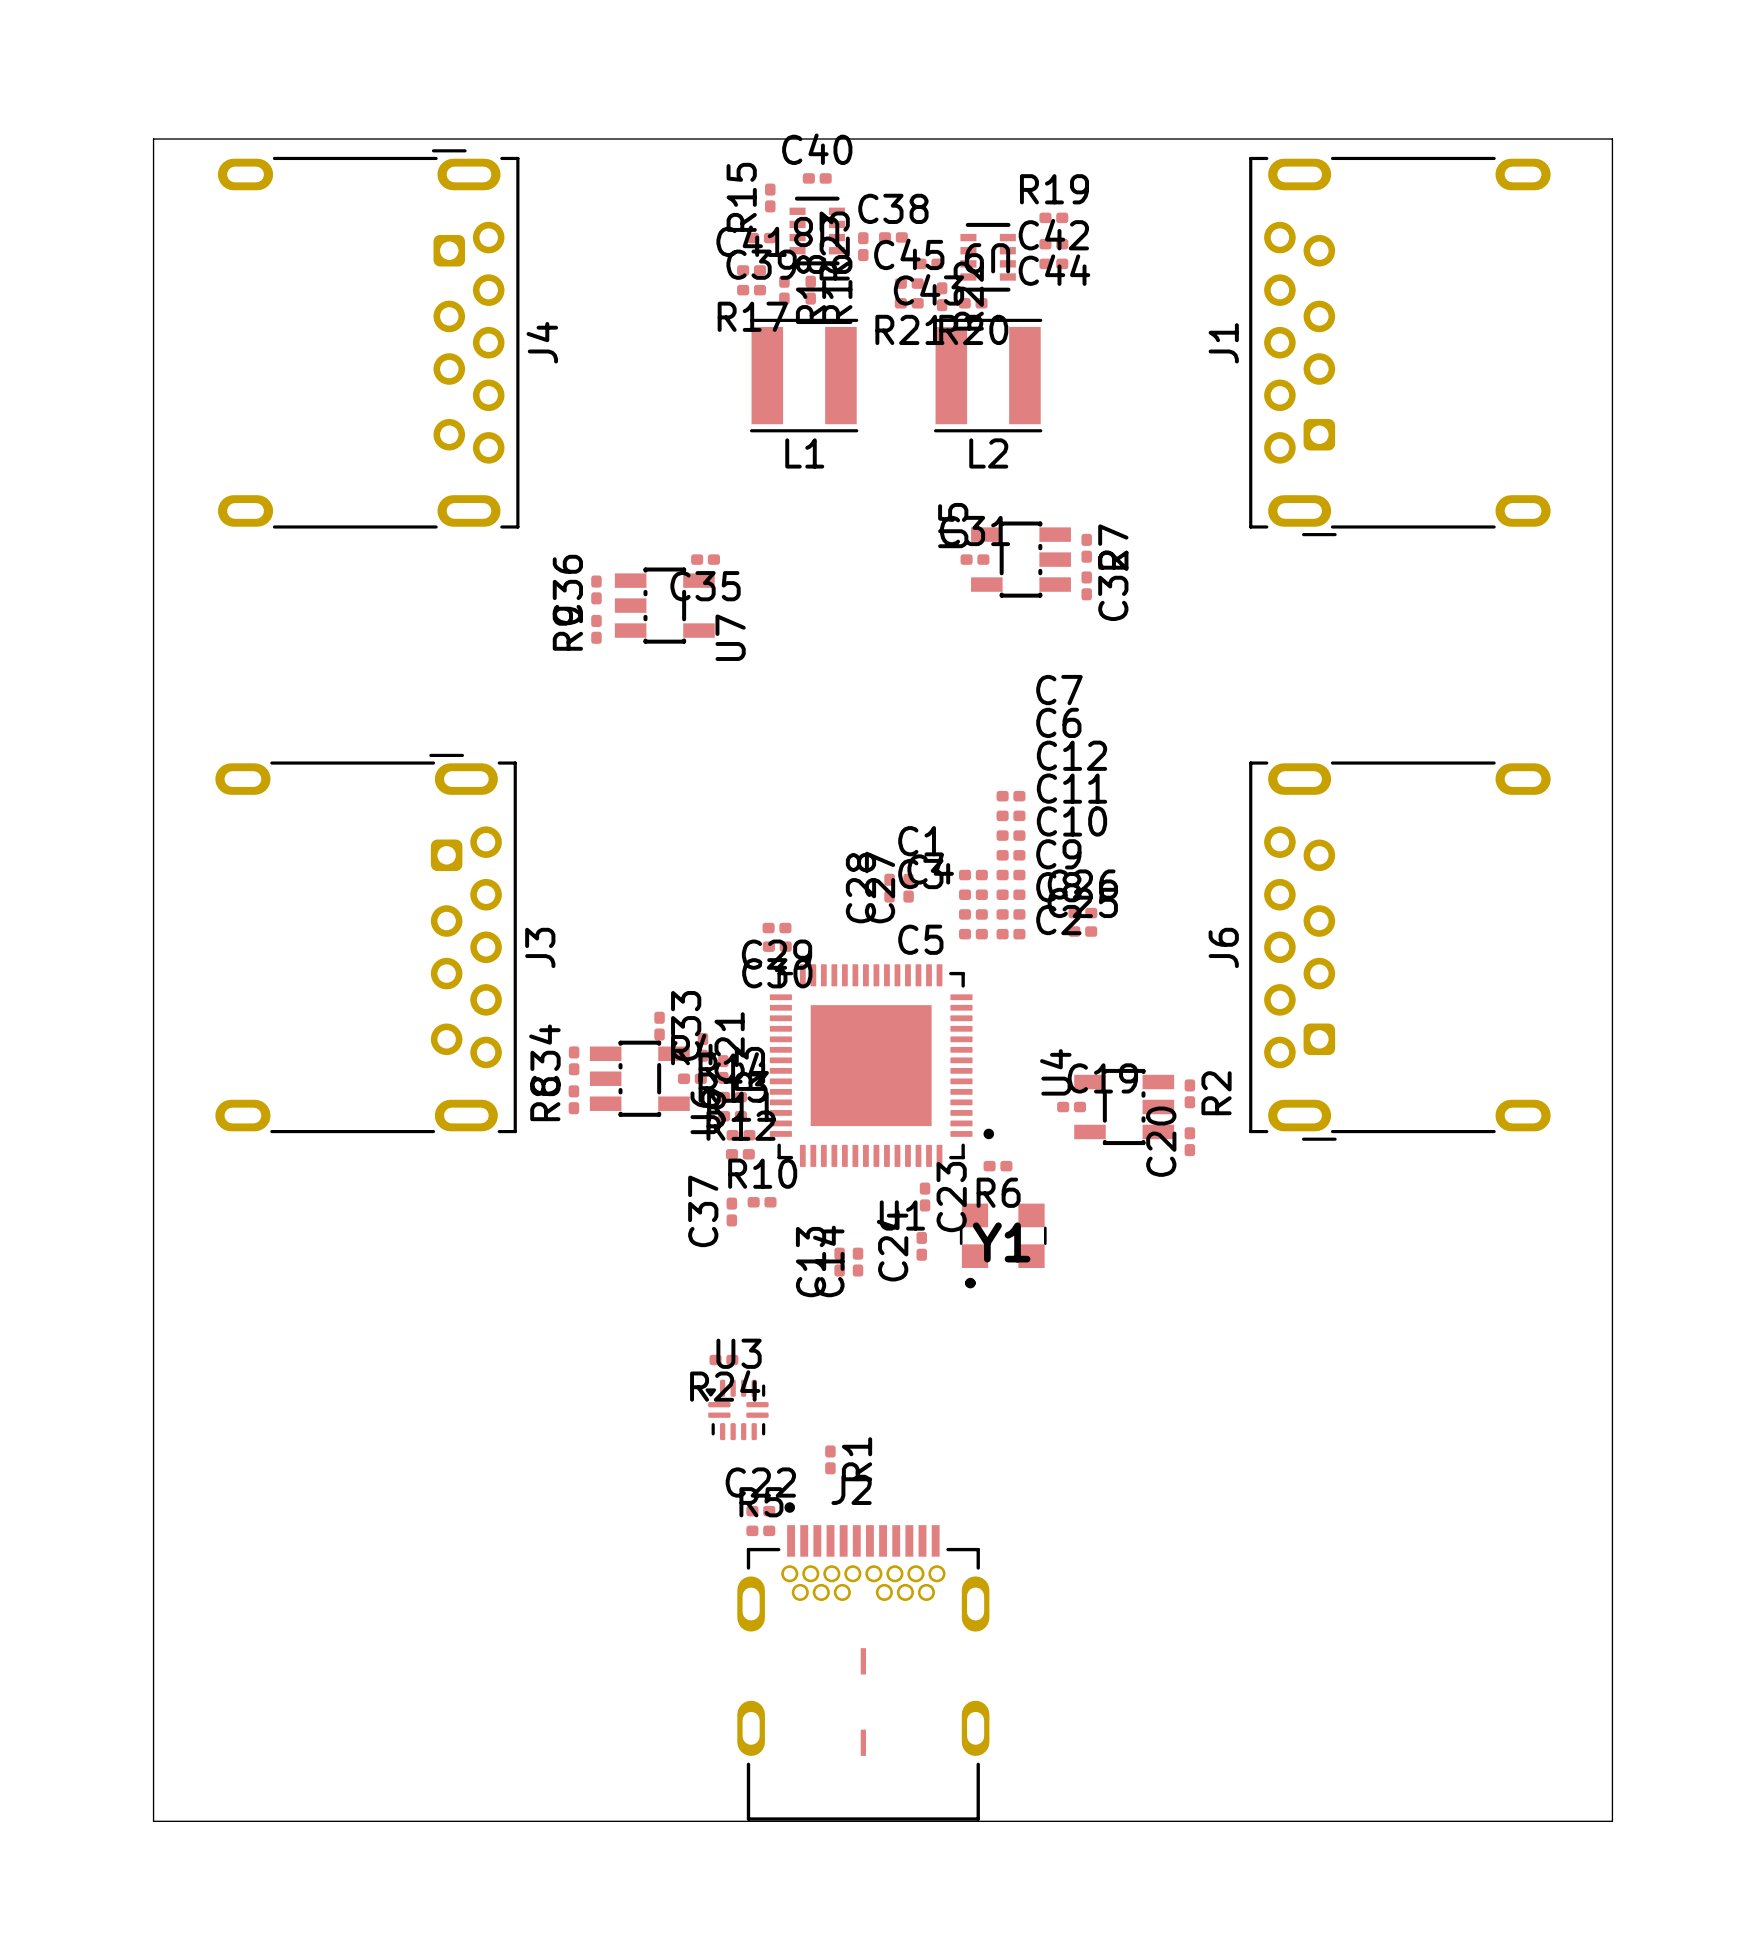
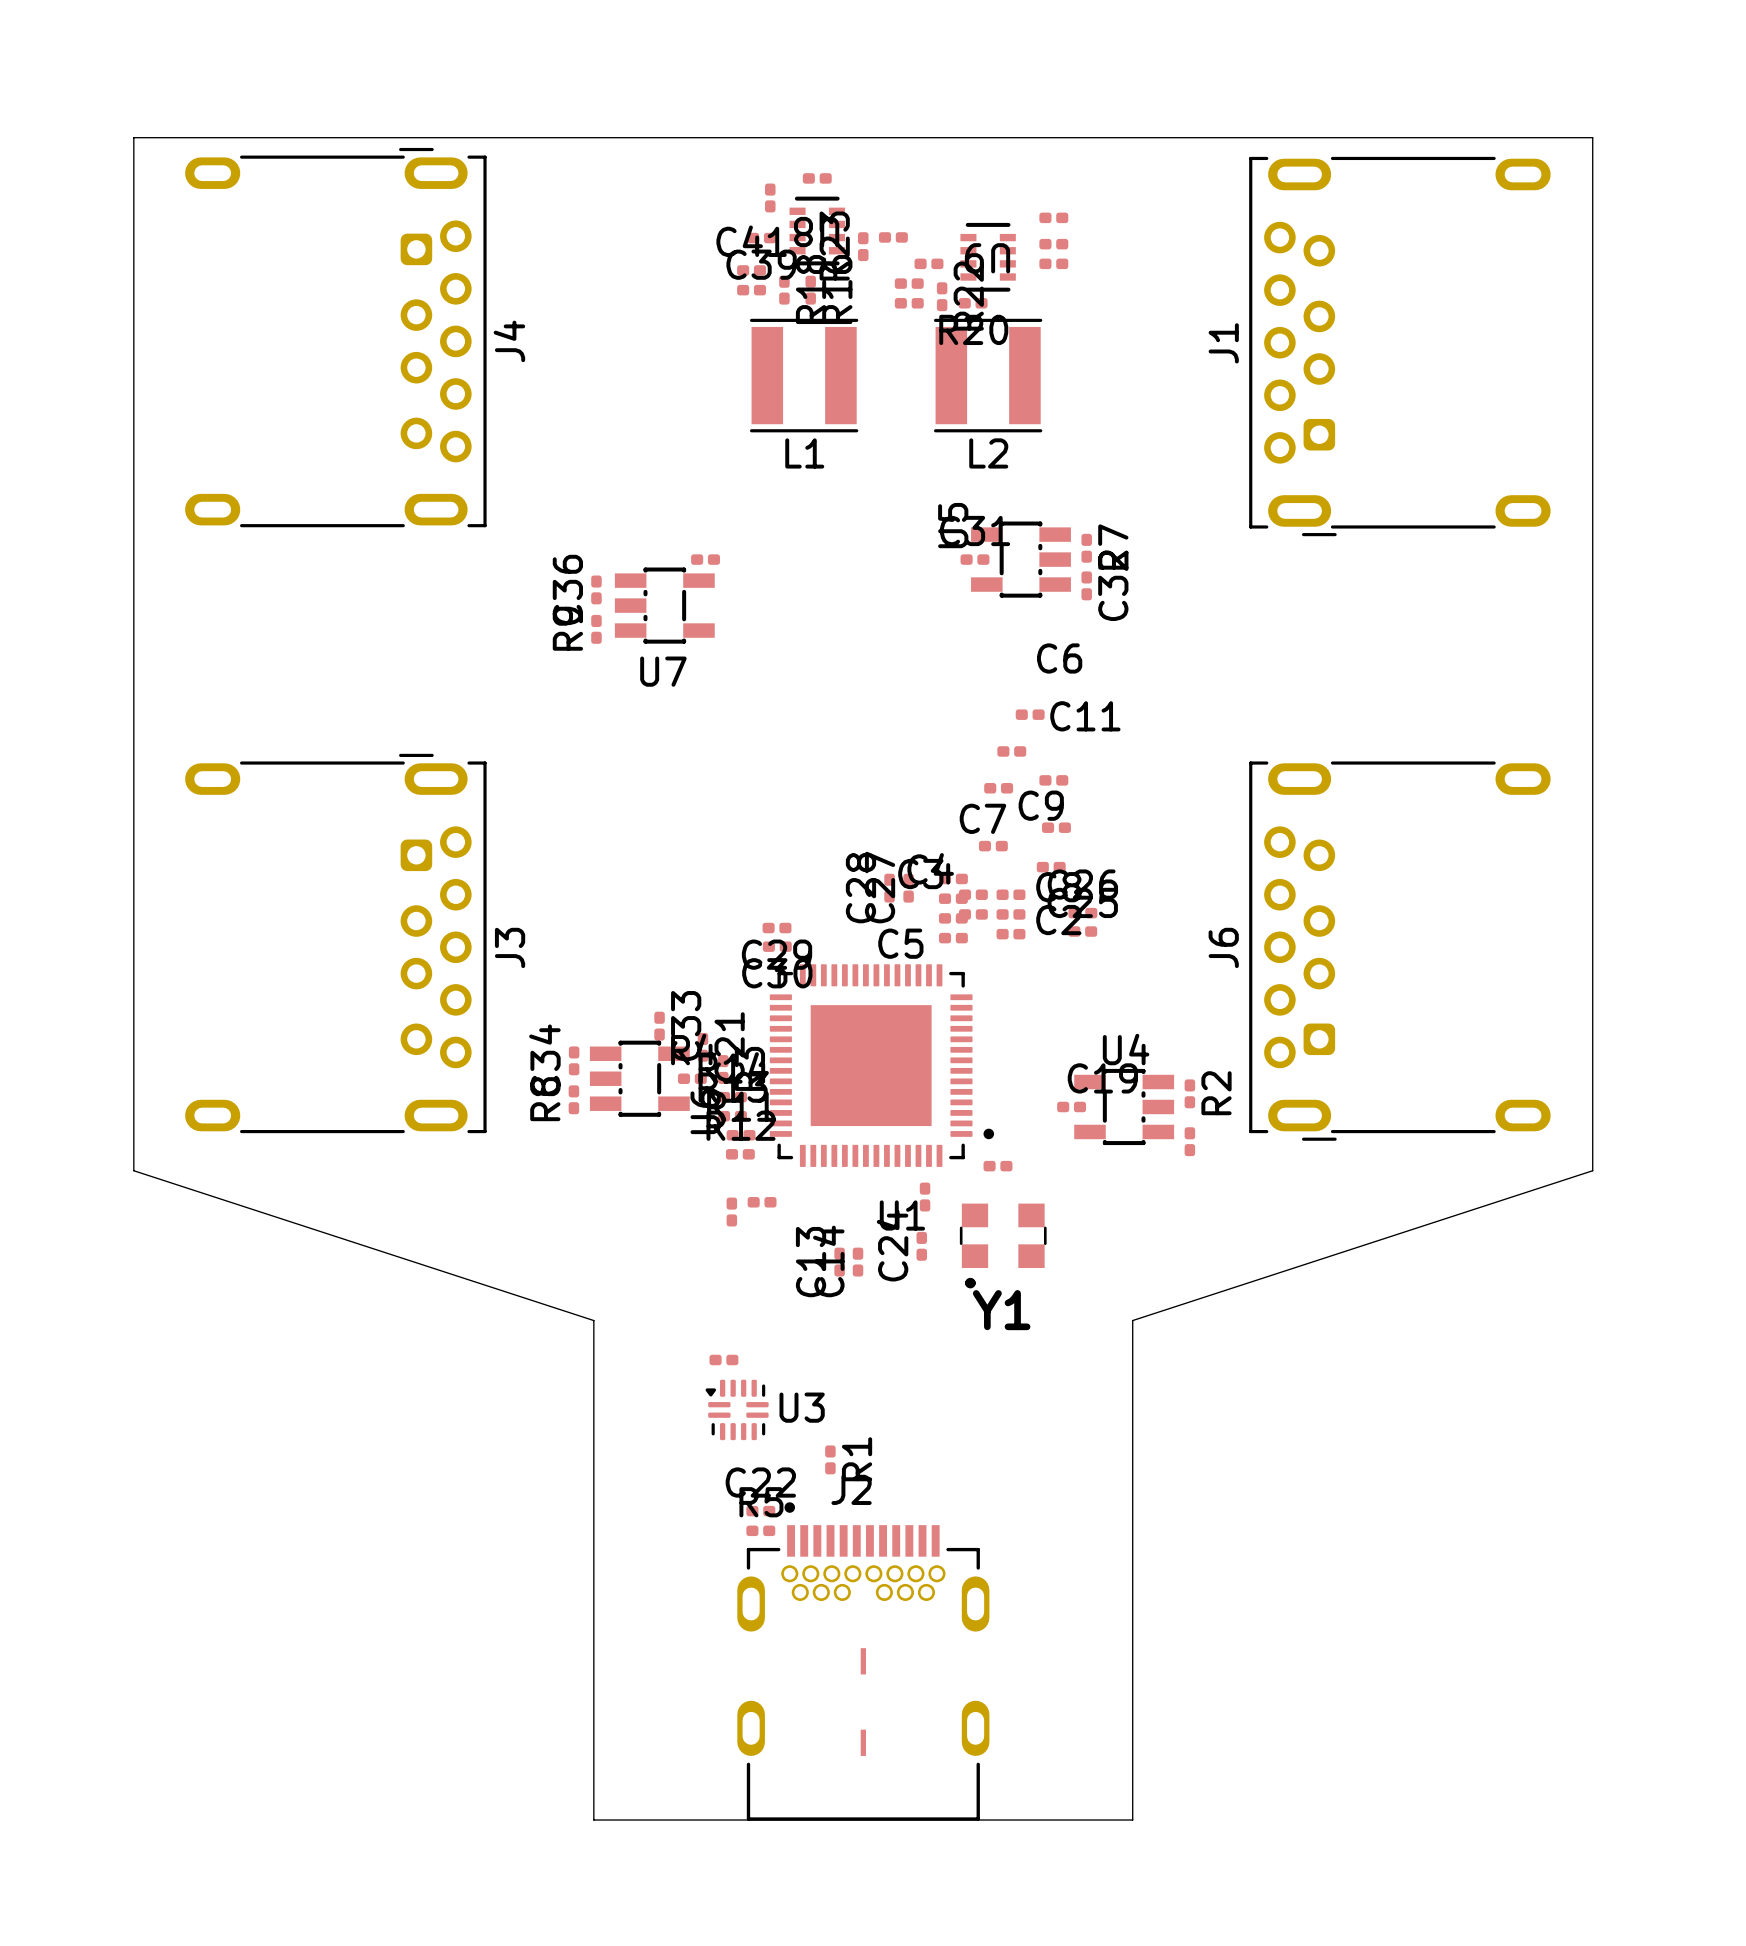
board edge: (153, 139) (1612, 139) (1612, 1821) (153, 1821) (153, 139) -> (133, 137) (133, 1170) (593, 1320) (593, 1820) (1132, 1820) (1132, 1320) (1592, 1170) (1592, 137) (133, 137)
C40 name: C40 (817, 149) -> none
R19 name: R19 (1054, 189) -> none
R15 name: R15 (741, 197) -> none
C38 name: C38 (893, 208) -> none
C42 name: C42 (1053, 234) -> none
C45 name: C45 (909, 254) -> none
C44 name: C44 (1054, 270) -> none
C43 name: C43 (928, 289) -> none
R17 name: R17 (752, 316) -> none
R21 name: R21 (909, 329) -> none
J4 position: (368, 338) -> (335, 337)
C35 name: C35 (705, 586) -> none
U7 name rotation: 0° (730, 637) -> 90° clockwise (663, 671)
U7 name position: U7 (730, 637) -> U7 (663, 671)
C7 name position: C7 (1059, 690) -> C7 (982, 818)
part: none -> (1053, 780)
C11 name position: C11 (1071, 788) -> C11 (1085, 716)
C7 position: (1011, 796) -> (1030, 714)
C6 position: (1011, 815) -> (1011, 751)
part: none -> (1056, 827)
C12: (1011, 835) -> none
C9: none -> (993, 846)
C9 name: C9 (1058, 854) -> none
C11 position: (1011, 855) -> (998, 788)
part: none -> (1051, 867)
C1: (973, 875) -> none
C10: (1011, 875) -> none
part: none -> (953, 878)
part: none -> (953, 898)
part: none -> (953, 918)
C5 position: (973, 934) -> (953, 938)
J3 position: (366, 943) -> (335, 943)
U4 name rotation: 0° (1055, 1072) -> 90° clockwise (1126, 1049)
U4 name position: U4 (1055, 1072) -> U4 (1126, 1049)
C20 name: C20 (1161, 1141) -> none
R10 name: R10 (762, 1173) -> none
R6 name: R6 (998, 1192) -> none
C23 name: C23 (951, 1197) -> none
C37 name: C37 (703, 1211) -> none
Y1 name position: Y1 (1001, 1242) -> Y1 (1001, 1310)
U3 name position: U3 (739, 1353) -> U3 (802, 1407)
R24 name: R24 (725, 1385) -> none

